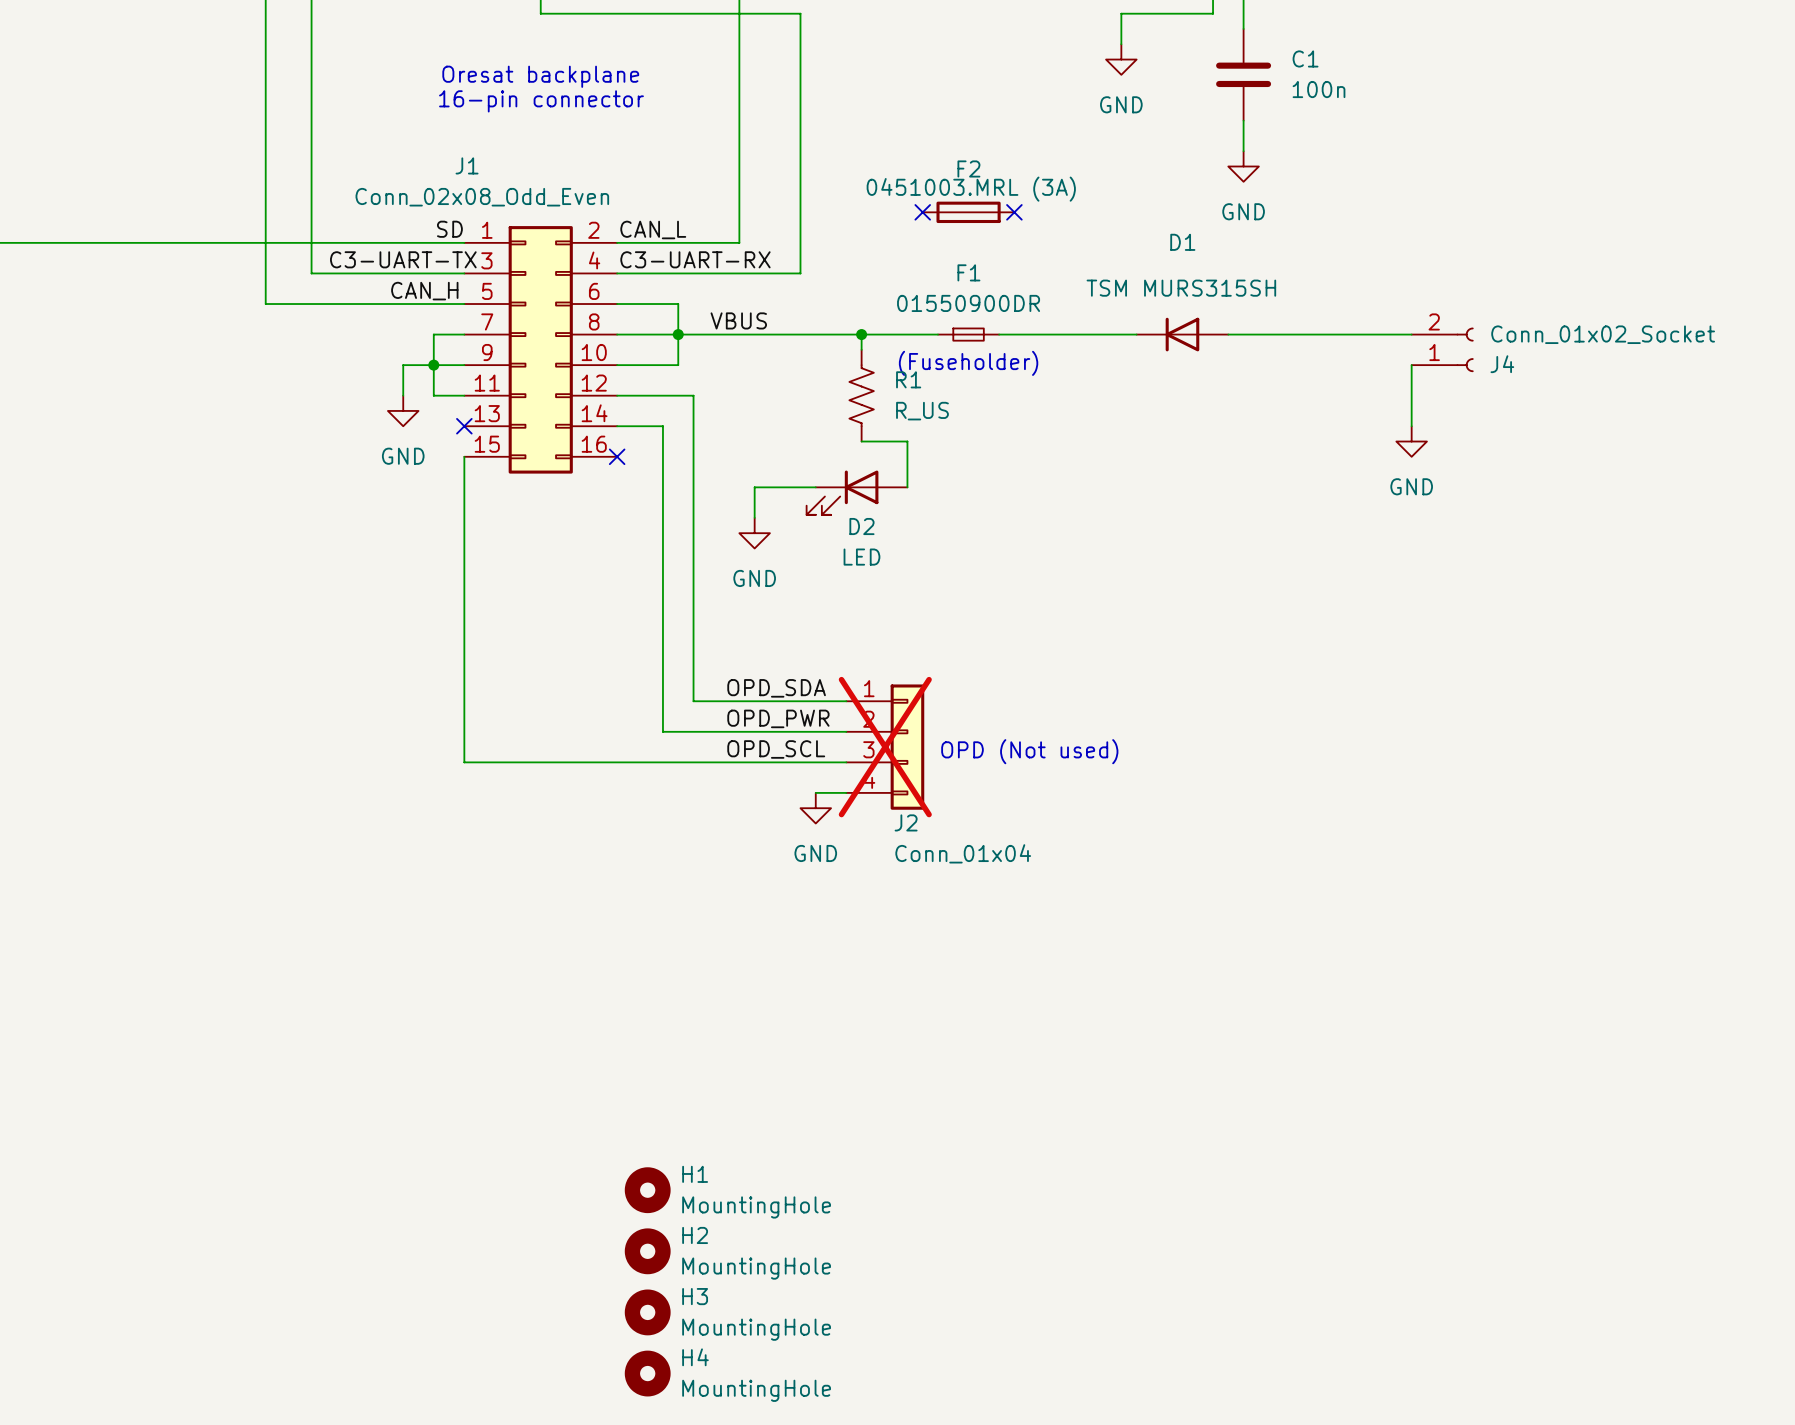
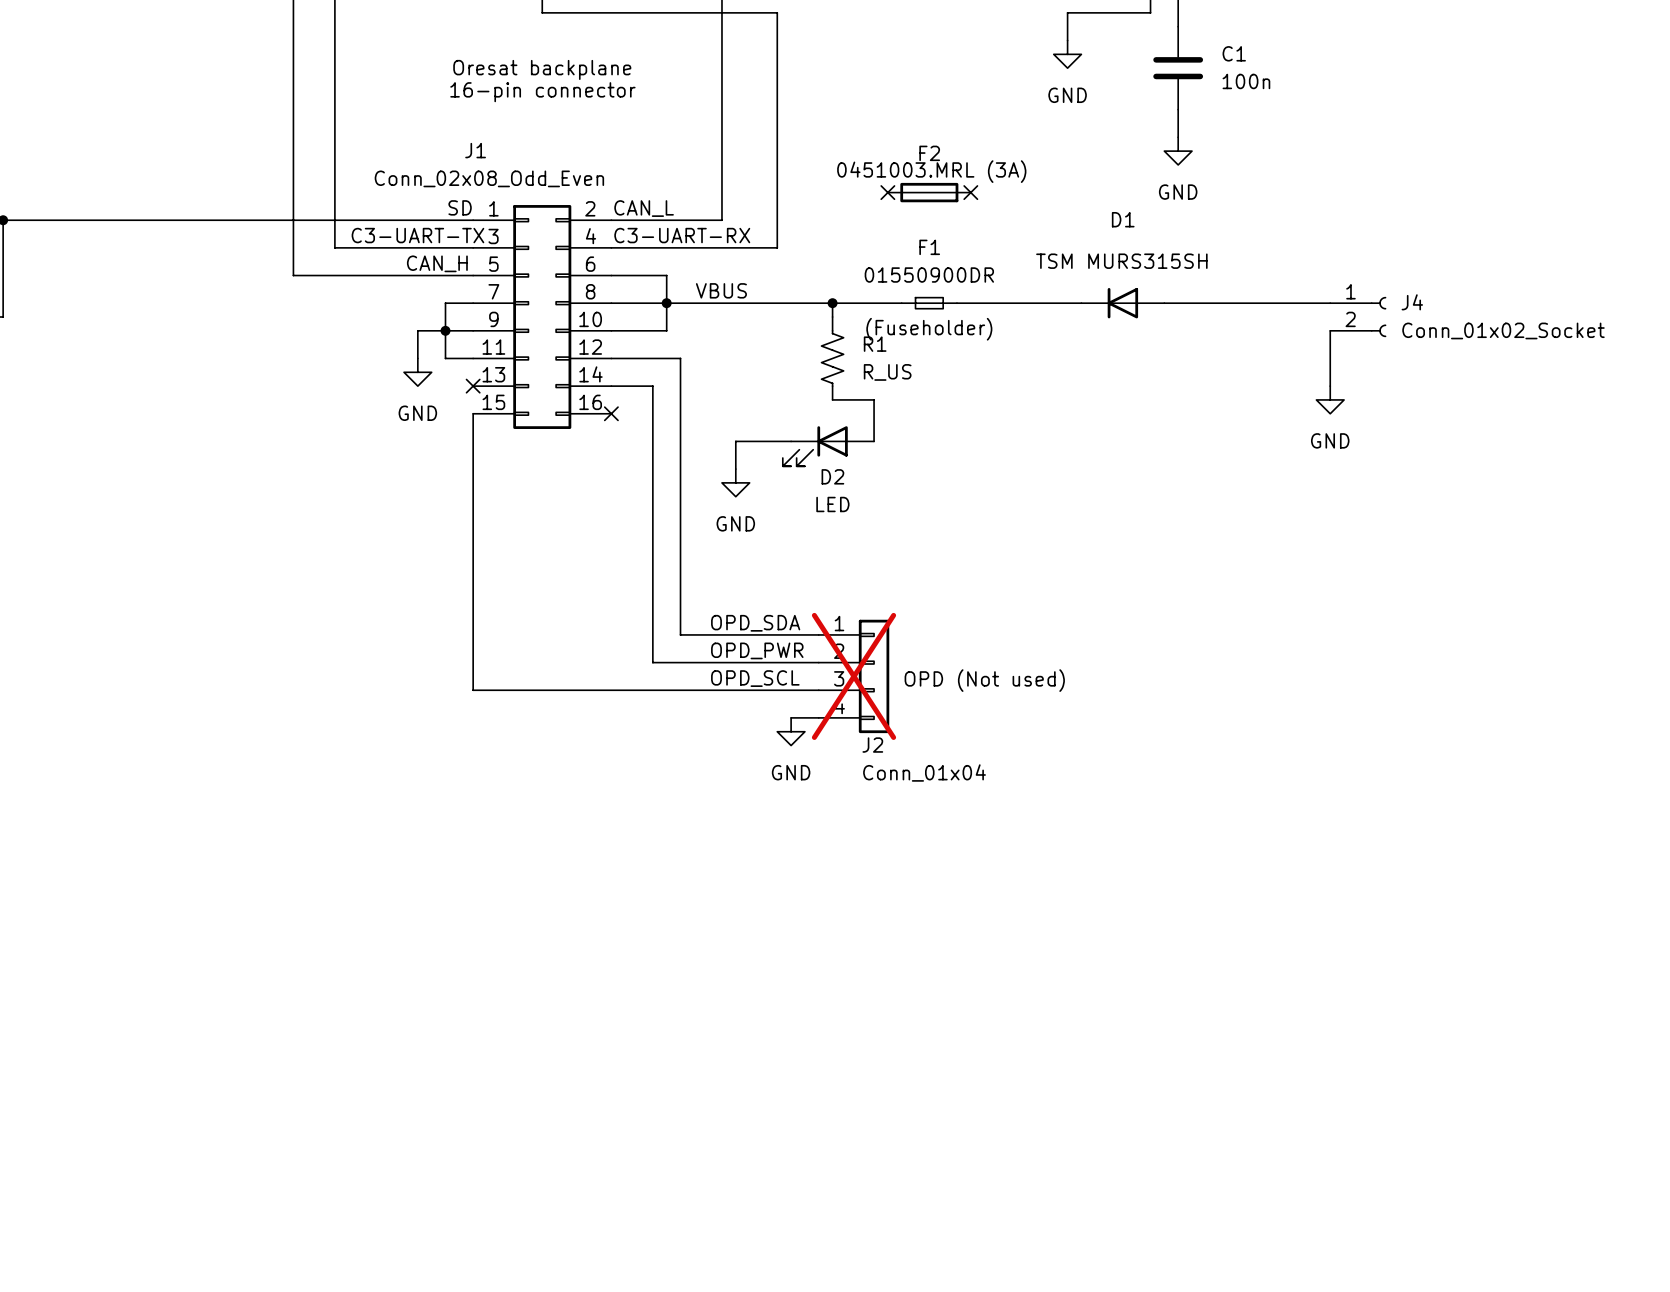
J4 flip: as is (1465, 349) -> up-down (1378, 317)
H1: MountingHole (647, 1190) -> none
H2: MountingHole (647, 1251) -> none
H3: MountingHole (647, 1312) -> none
H4: MountingHole (647, 1373) -> none

